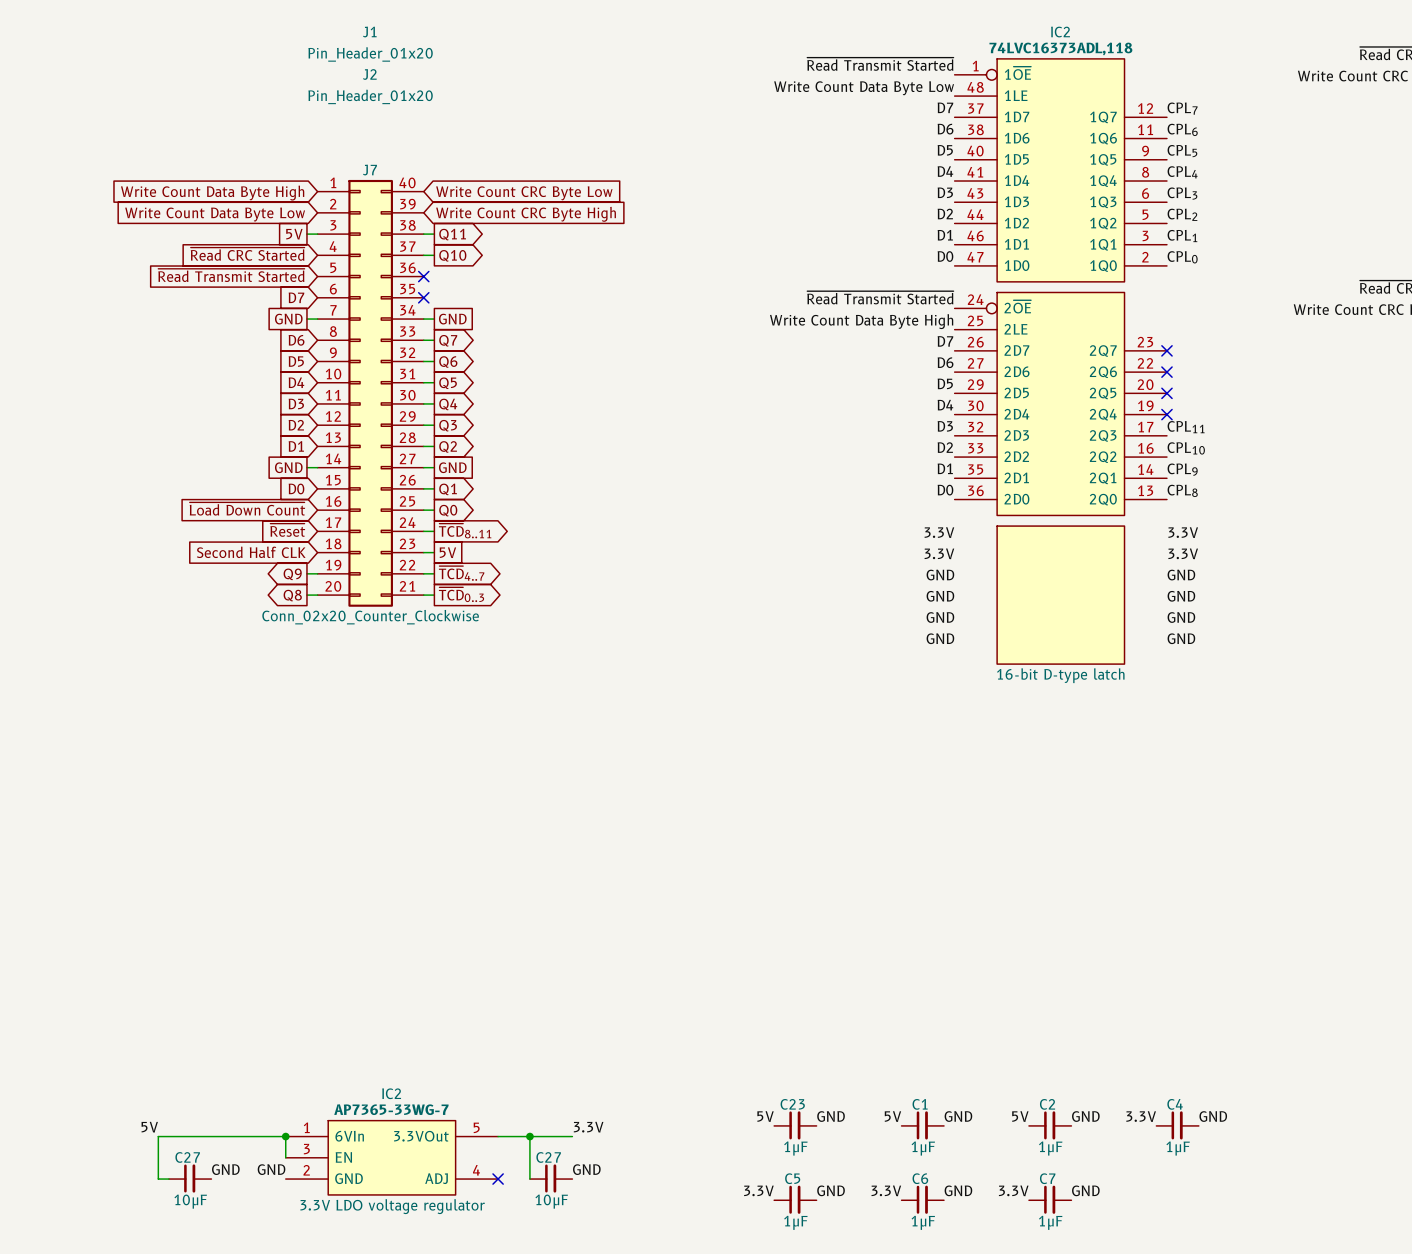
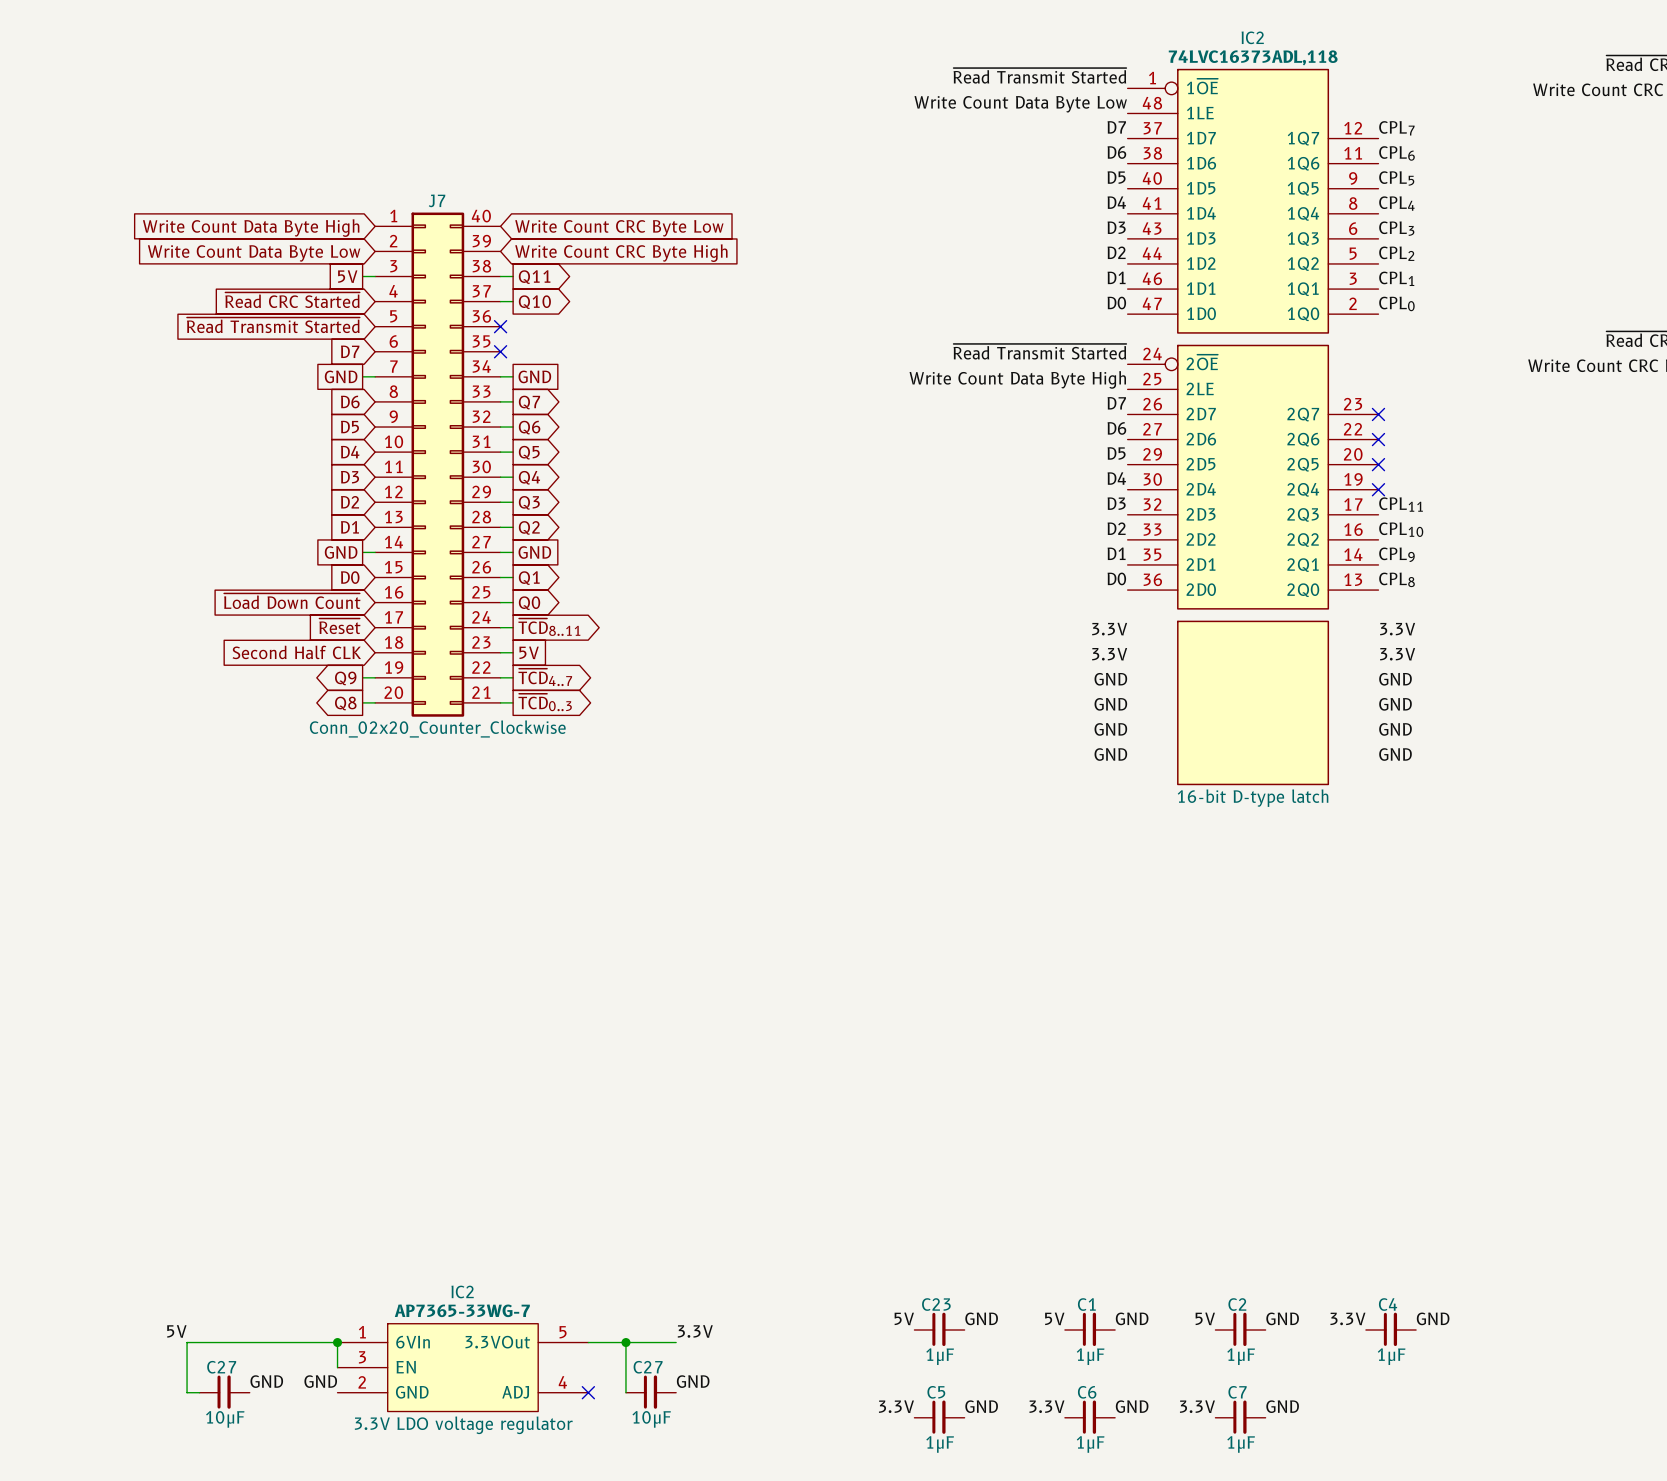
J1: Pin_Header_01x20 (370, 44) -> none
J2: Pin_Header_01x20 (370, 86) -> none

